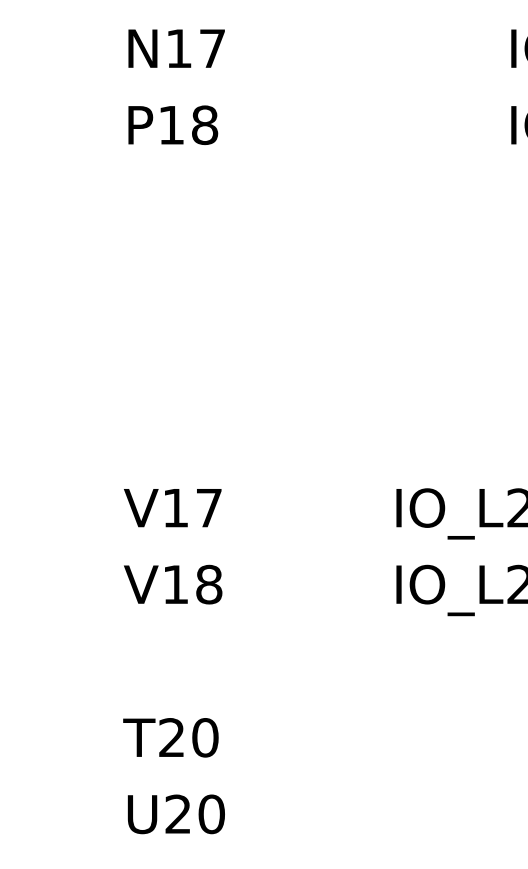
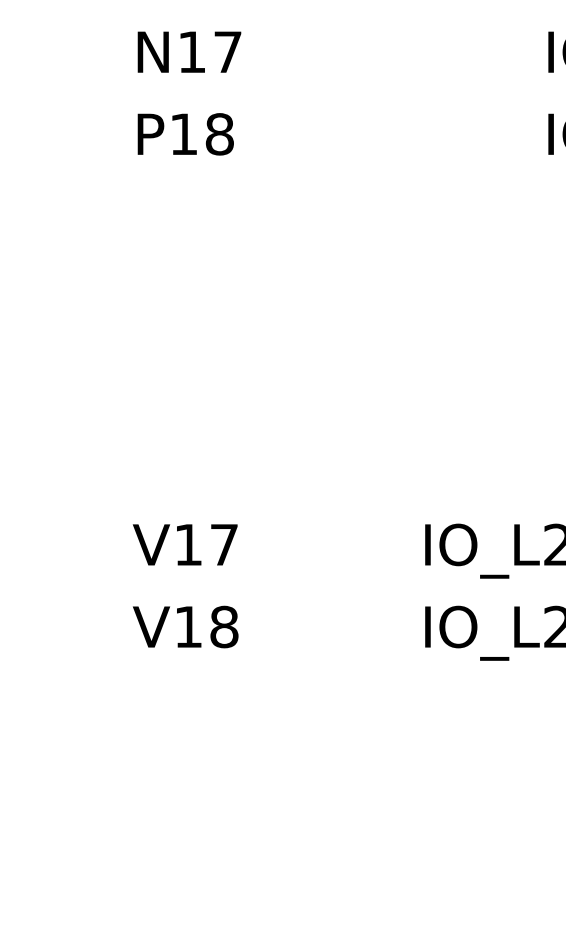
text: T20 (170, 737) -> none
text: U20 (176, 814) -> none

